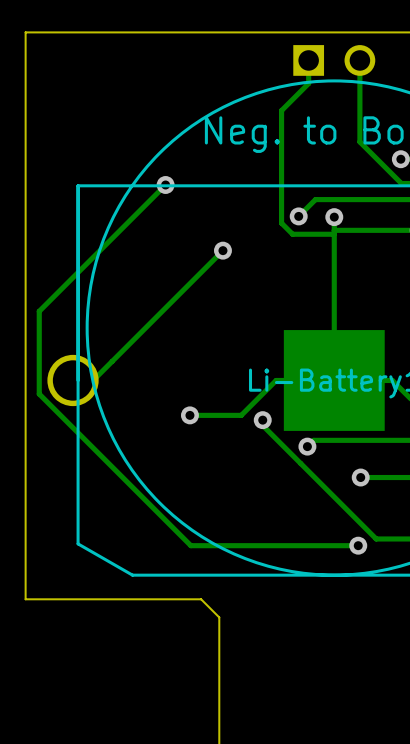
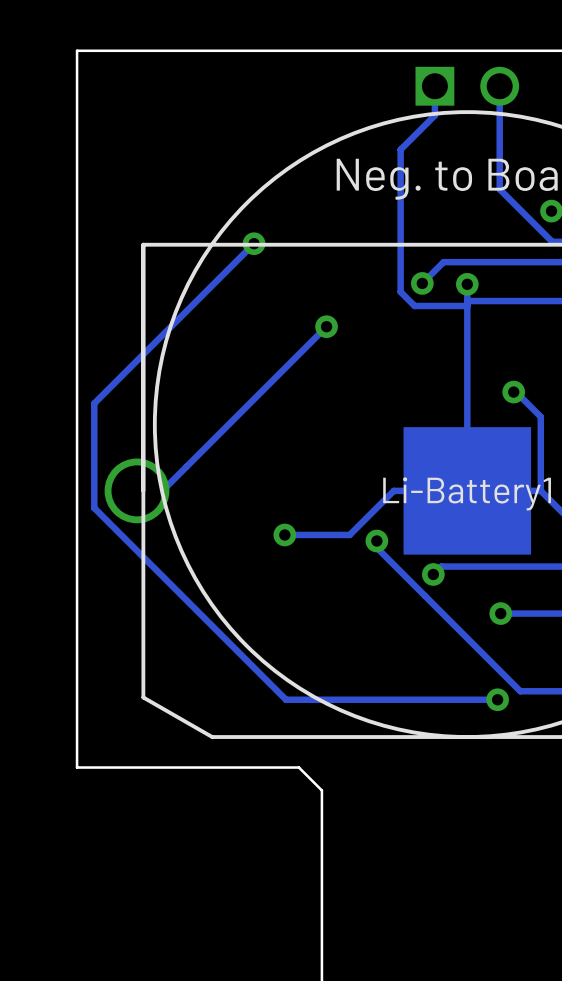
track: none -> (513, 392) (516, 392) (540, 416) (540, 490)
via: none -> (513, 392)

